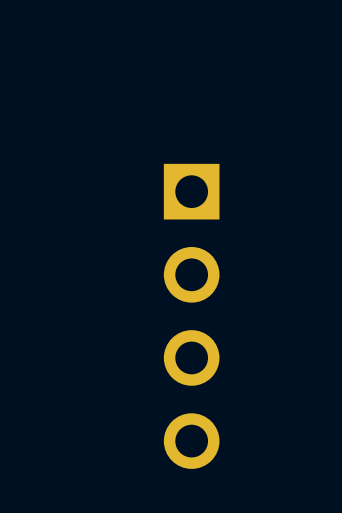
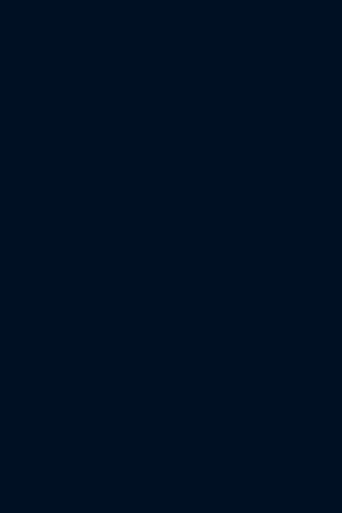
part: (191, 316) -> none

